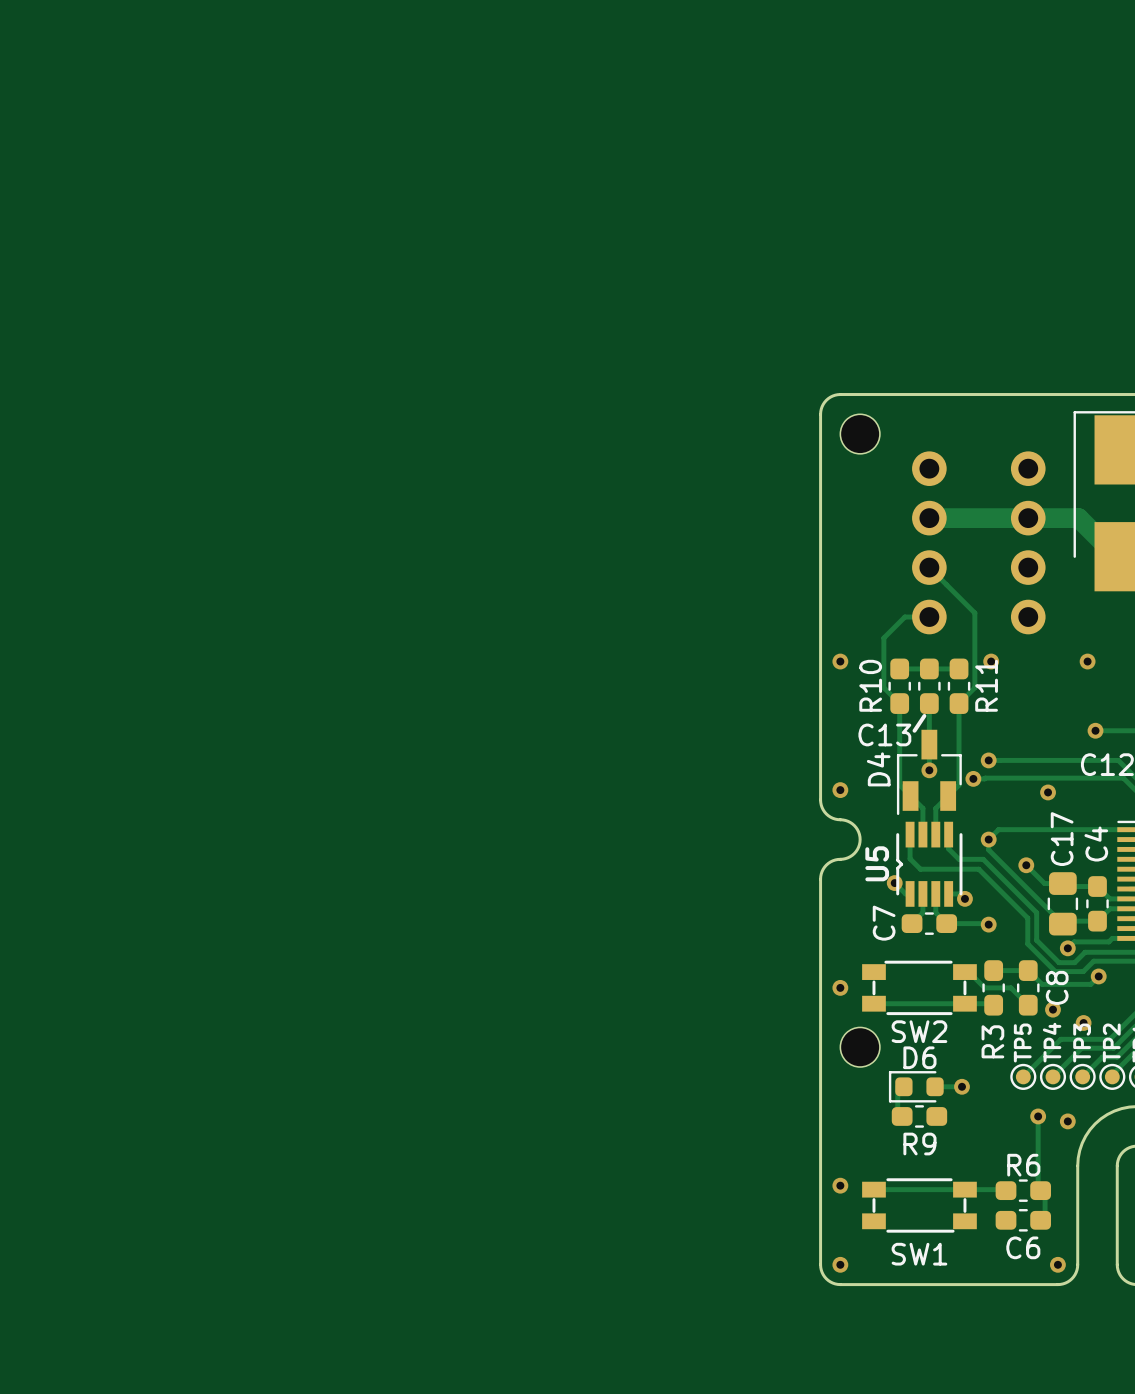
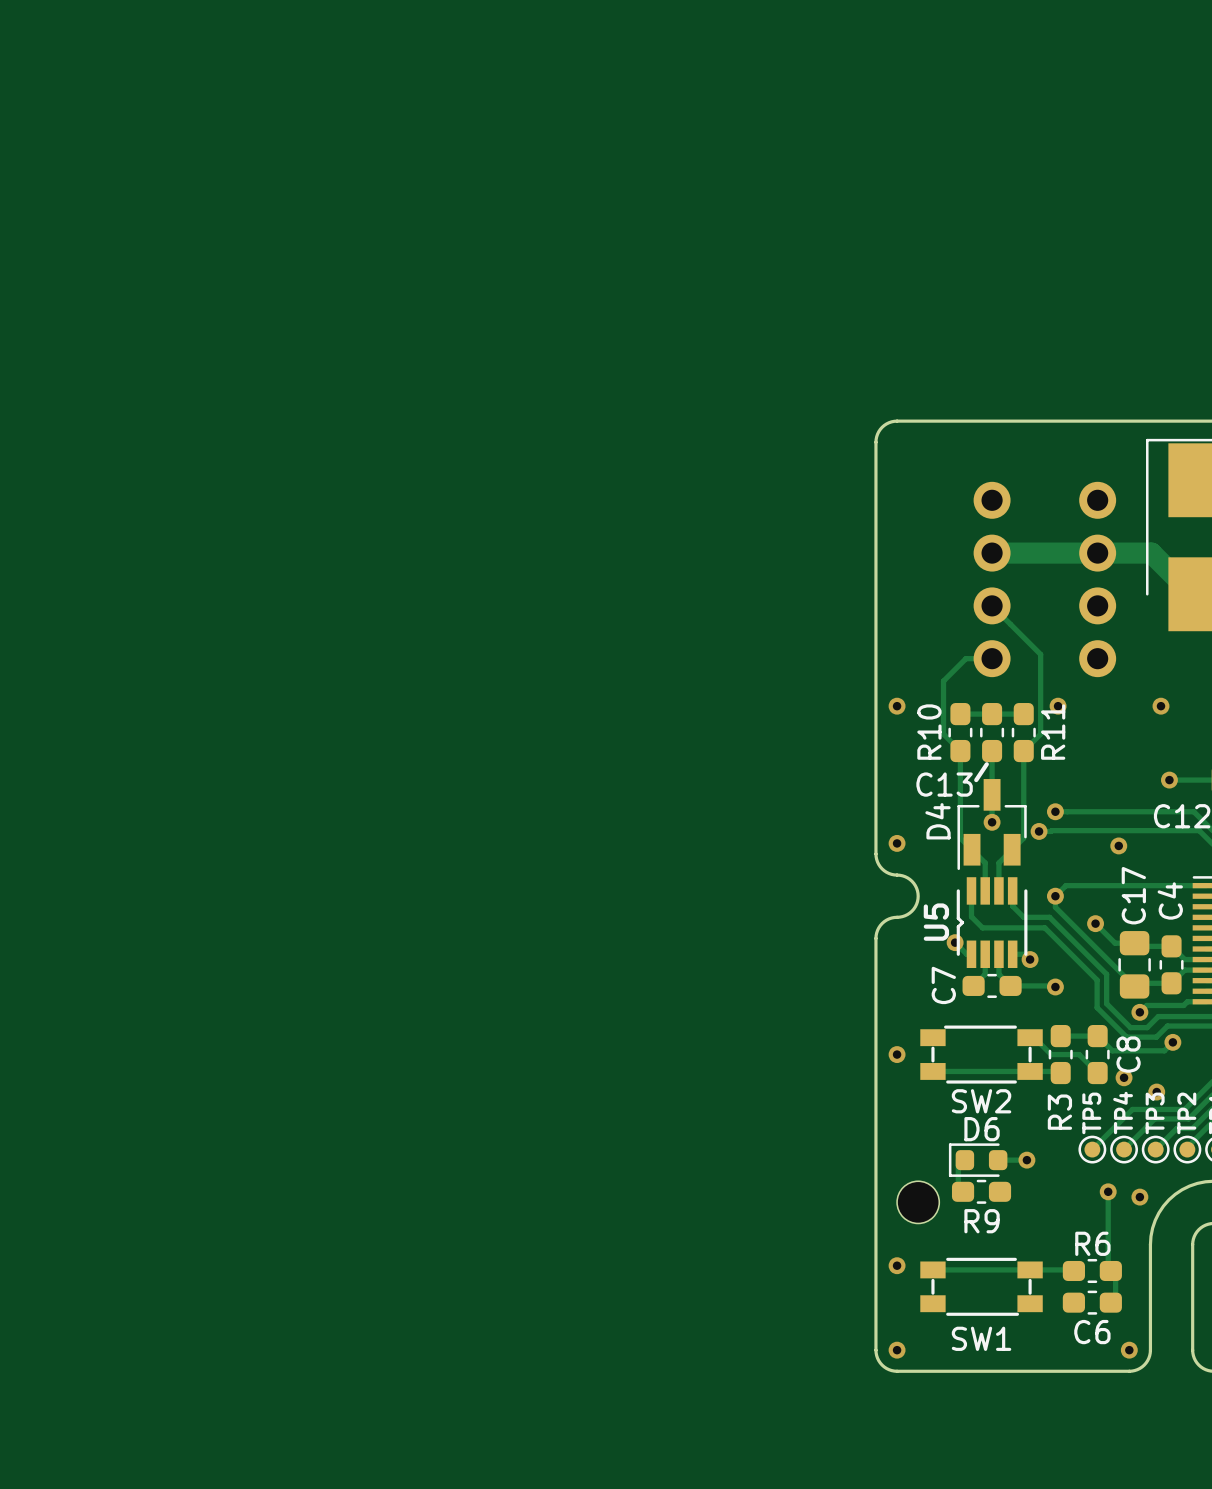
part: (860, 434) -> none
part position: (860, 1047) -> (918, 1202)

